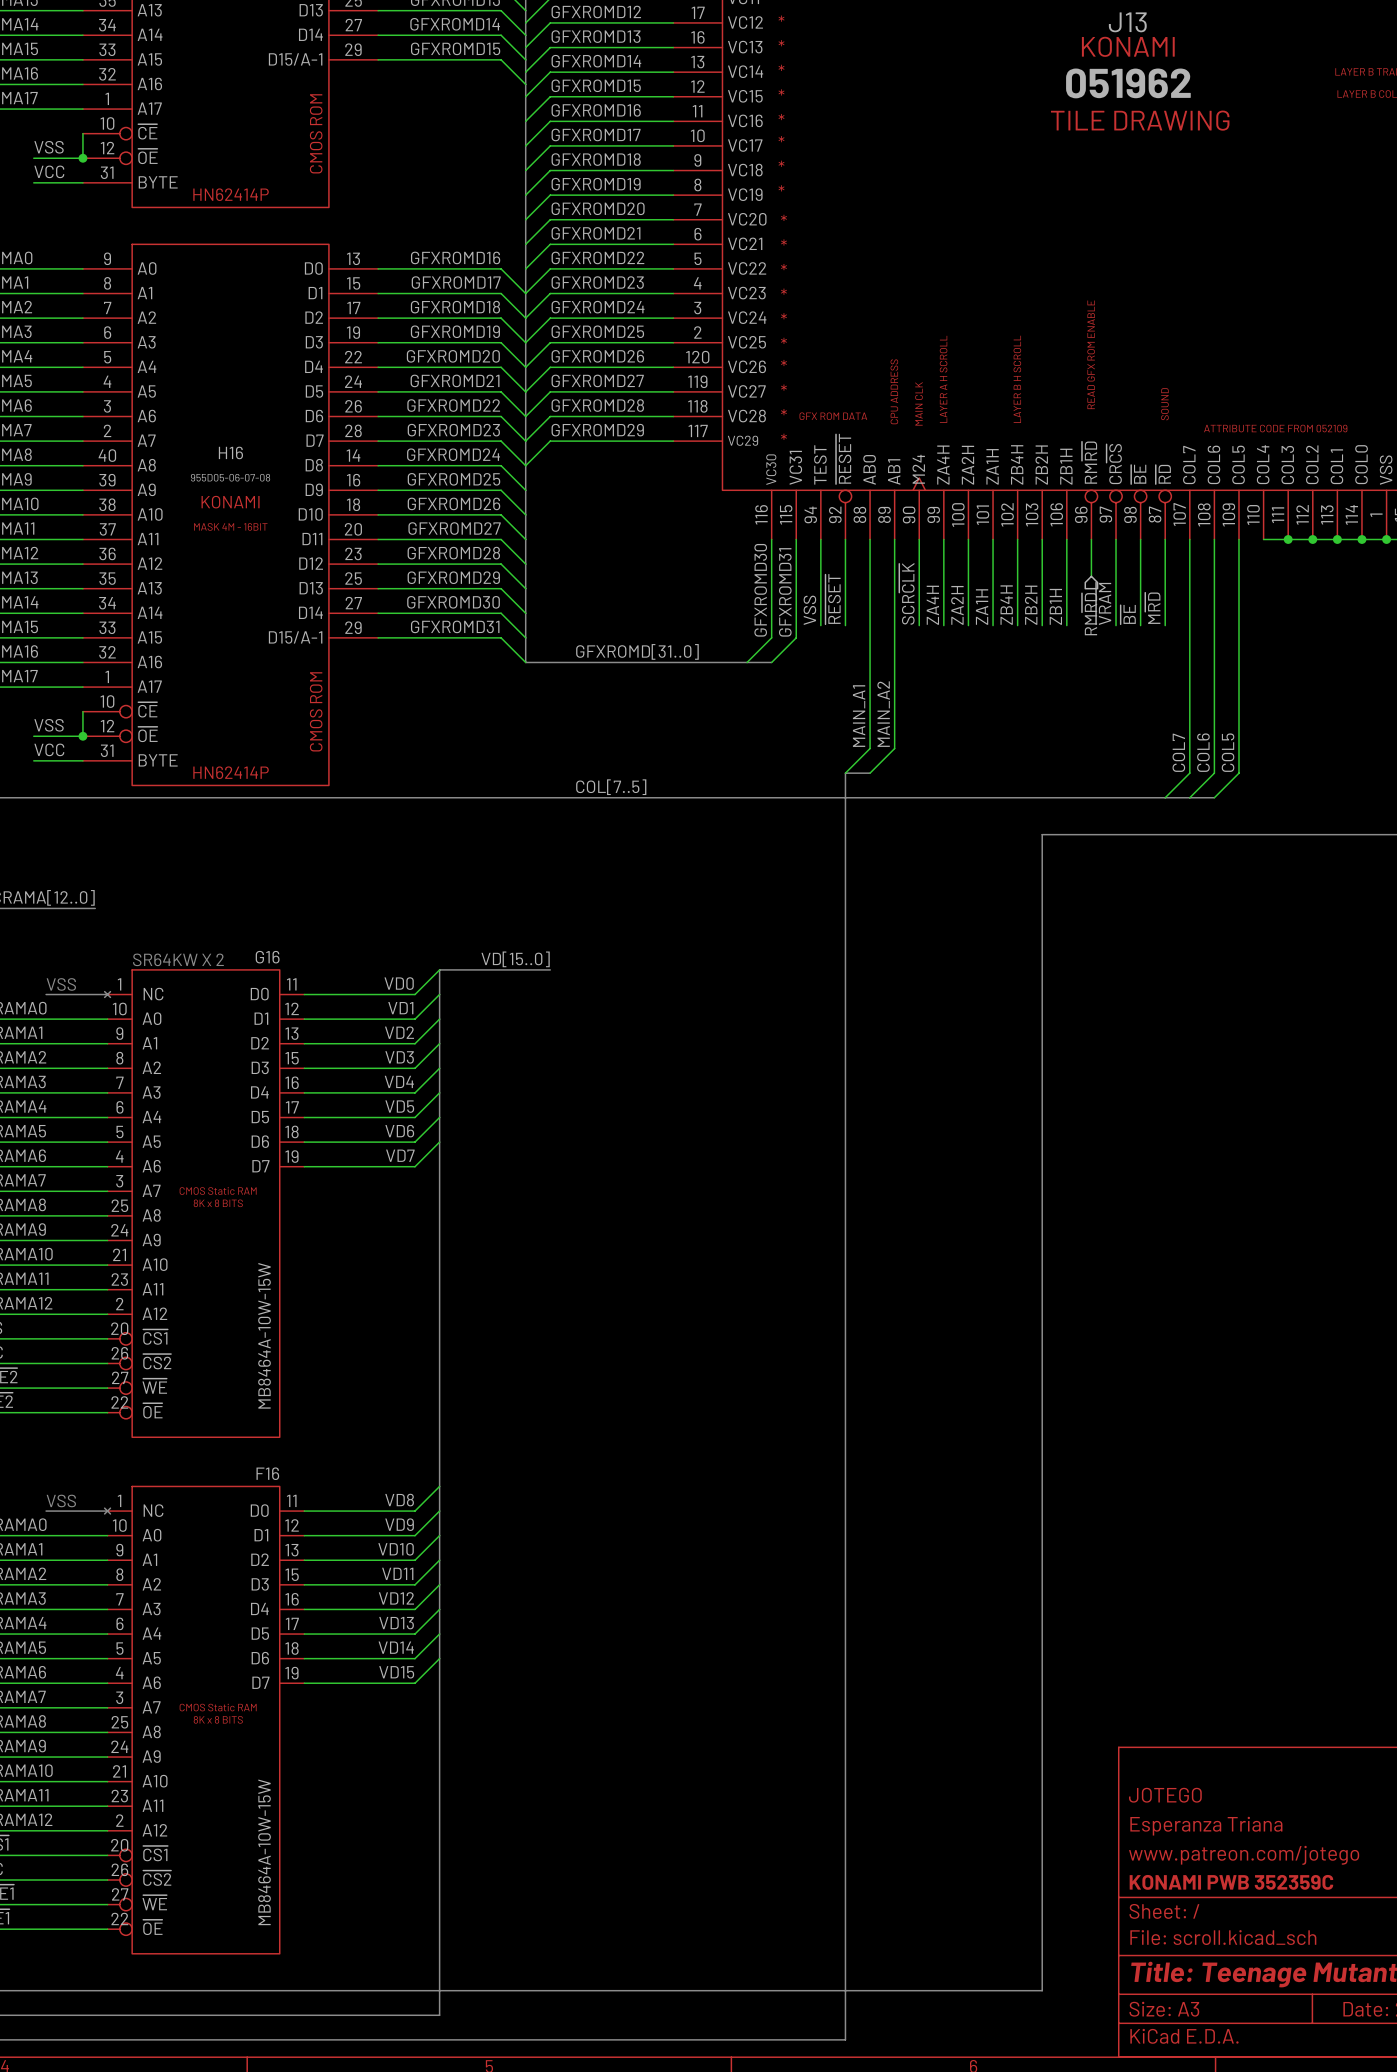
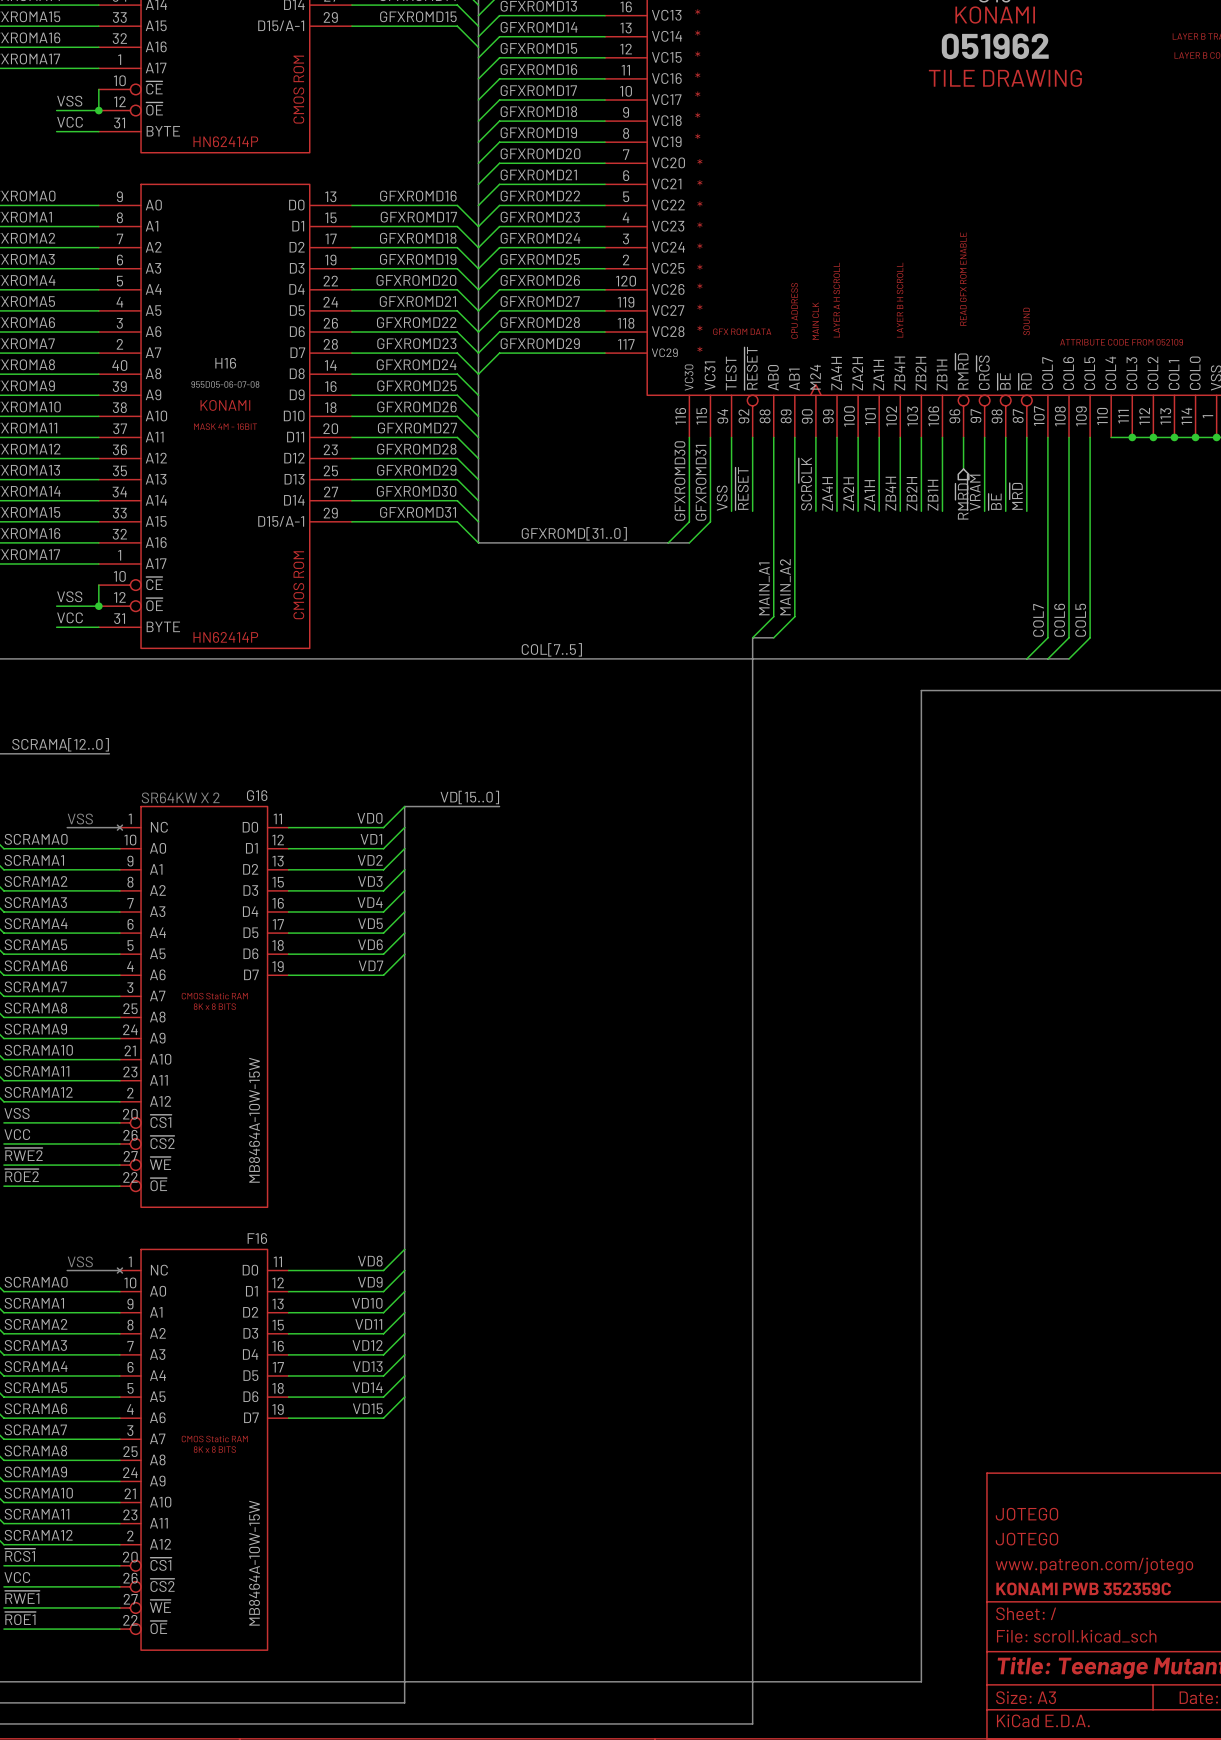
title block: Esperanza Triana (1206, 1826) -> JOTEGO (1026, 1539)

